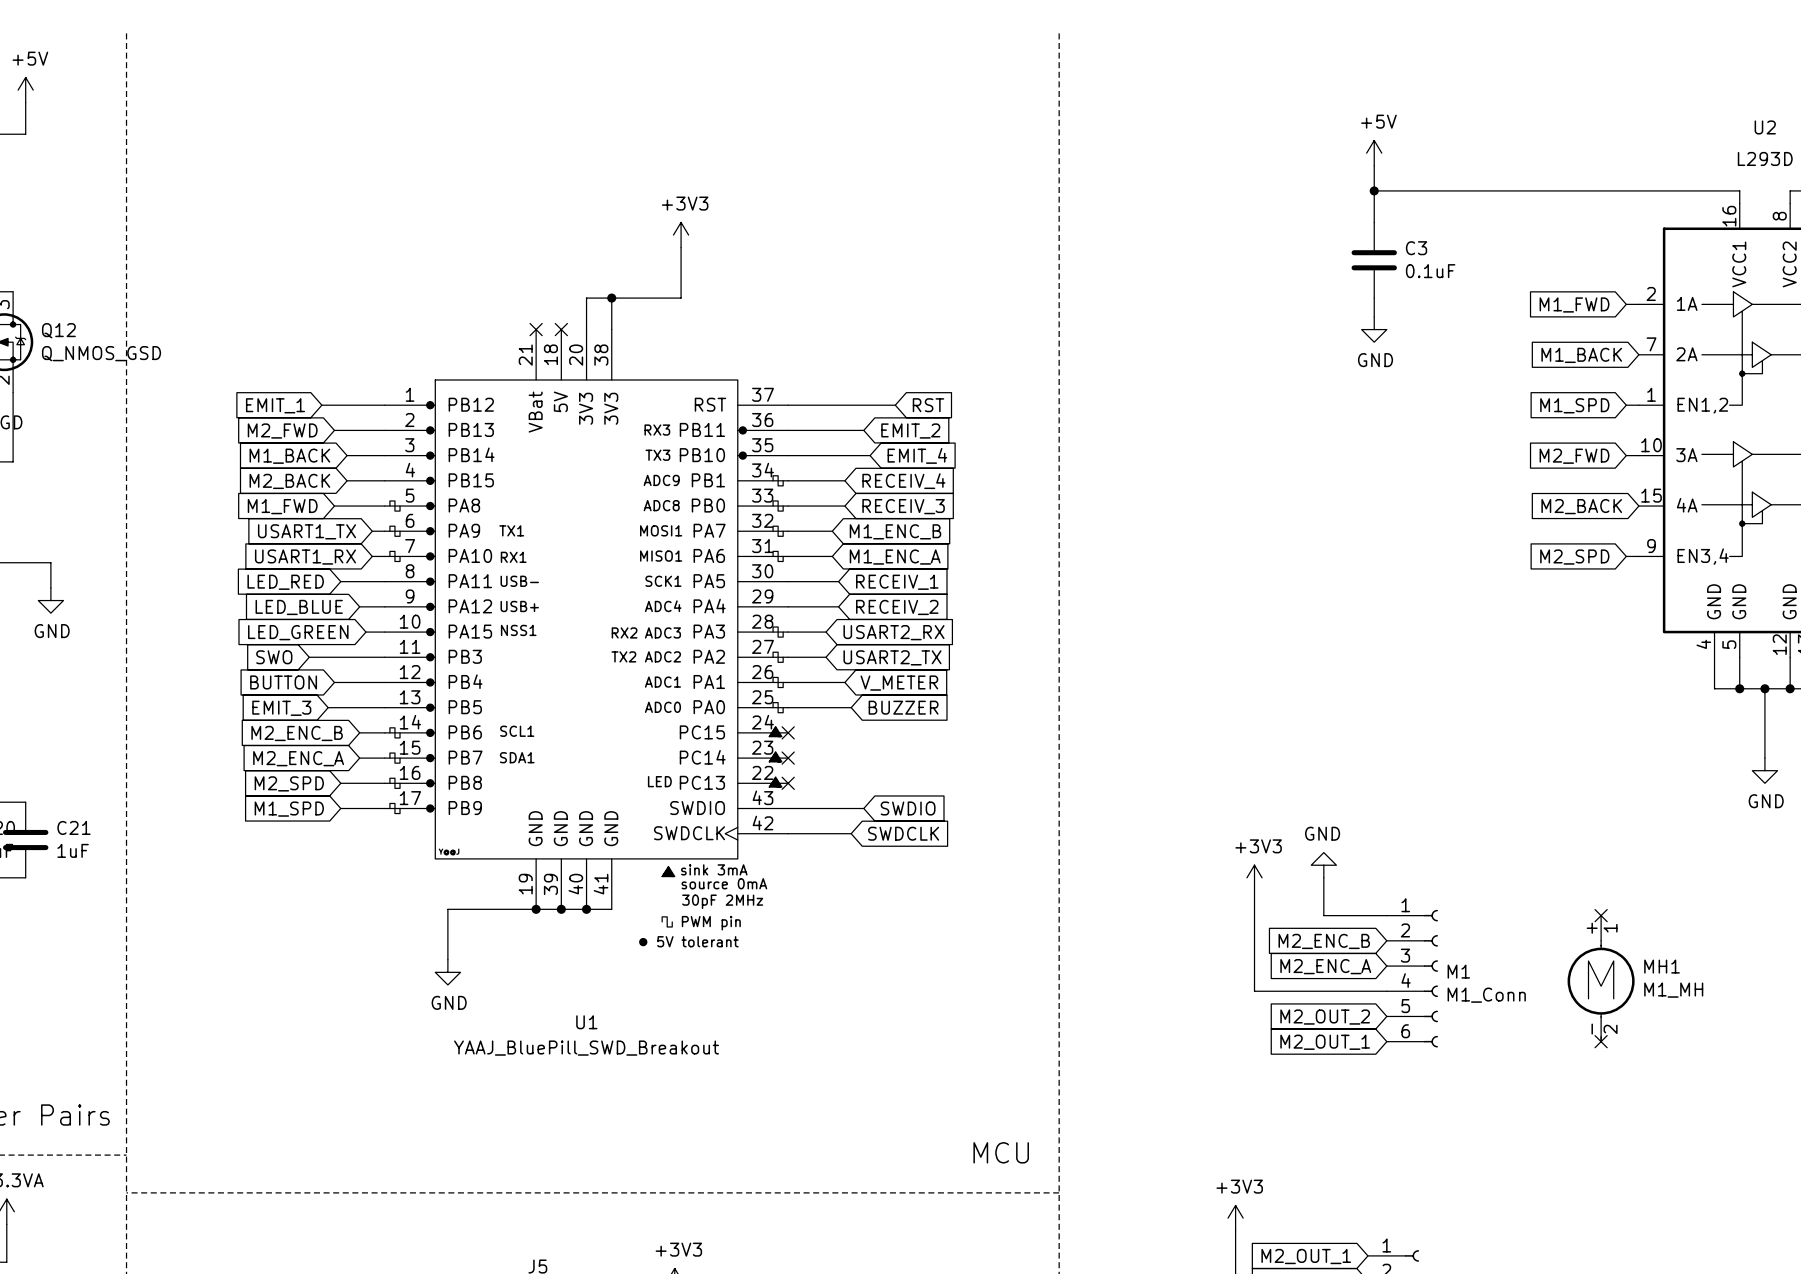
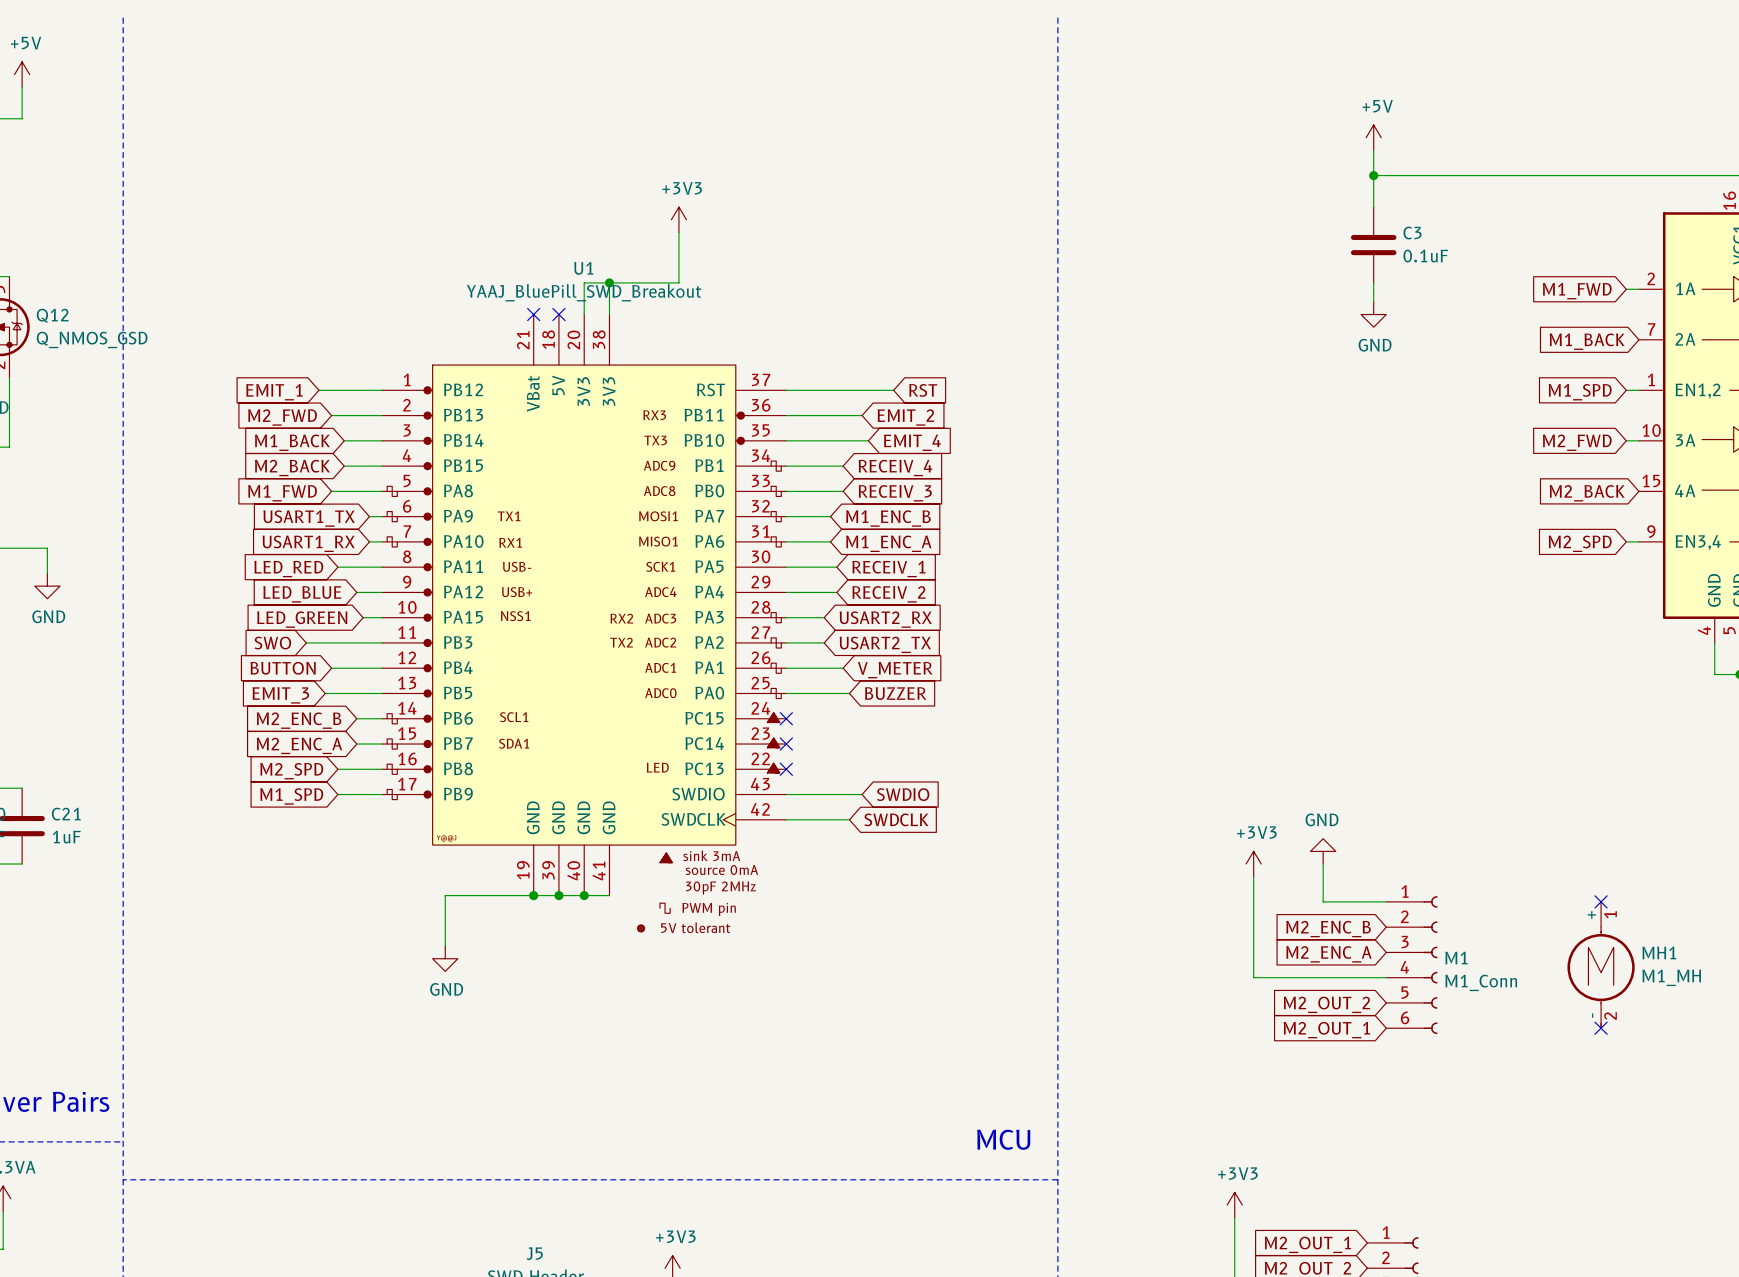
U1 name position: U1 (586, 1022) -> U1 (583, 268)
U1 value position: YAAJ_BluePill_SWD_Breakout (586, 1048) -> YAAJ_BluePill_SWD_Breakout (584, 292)

